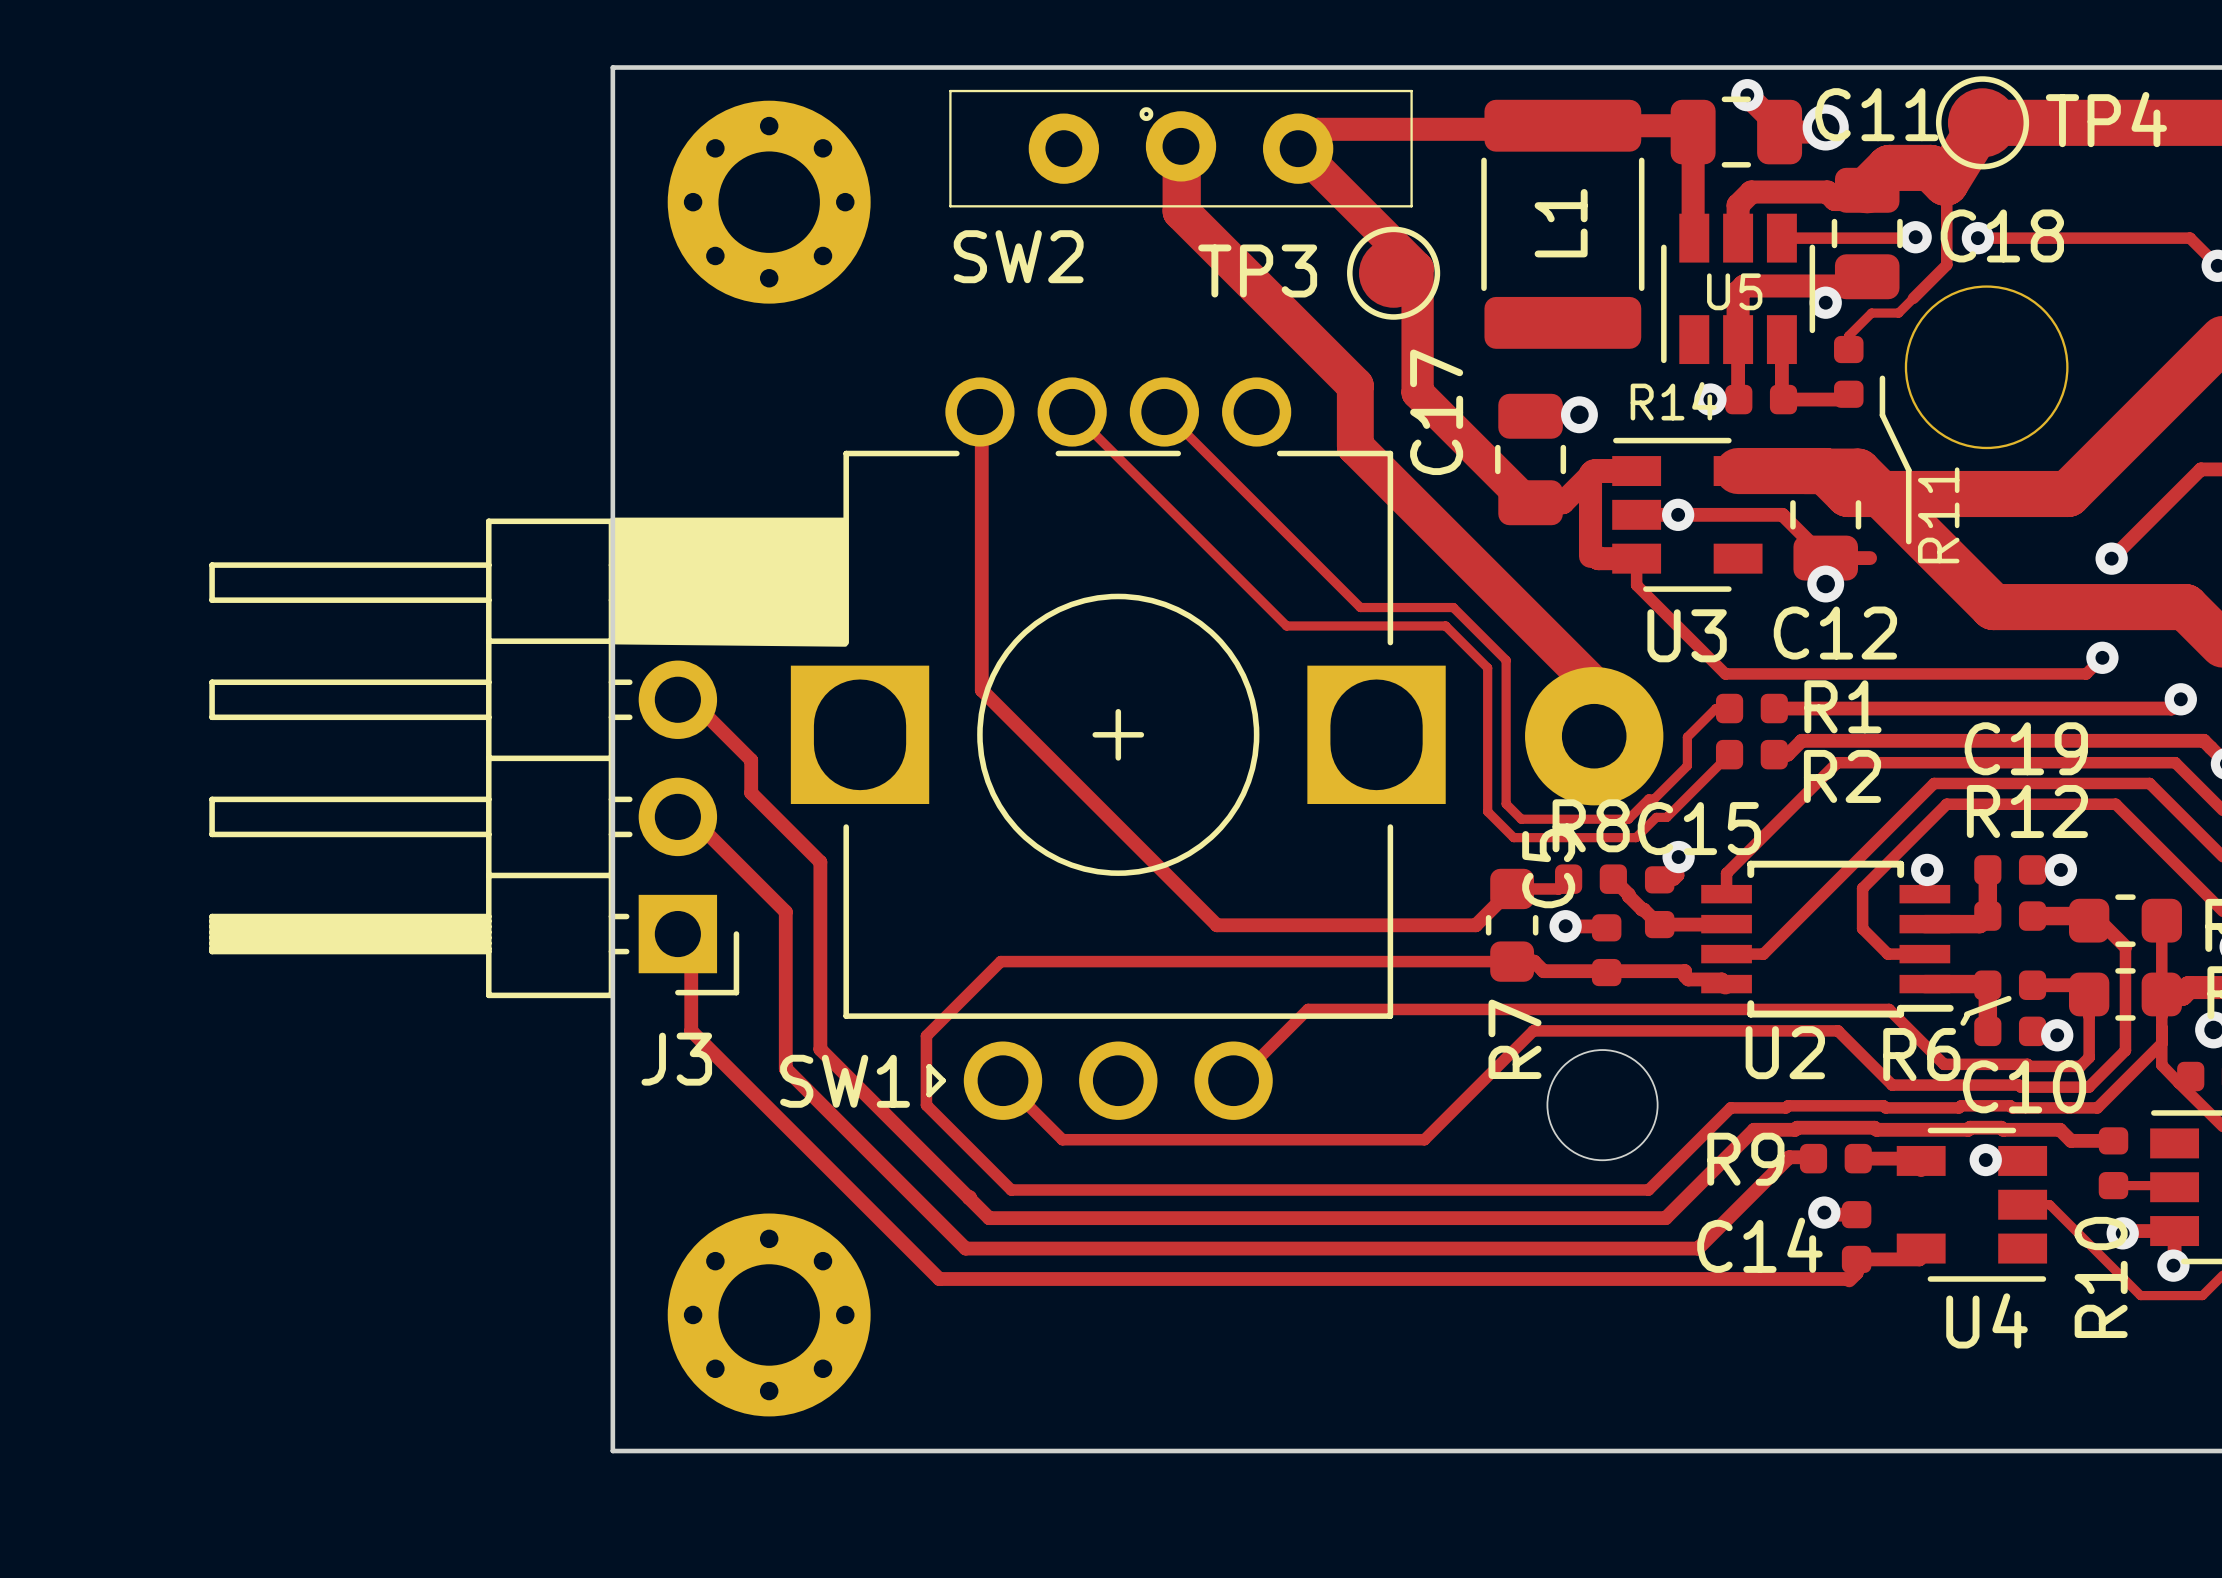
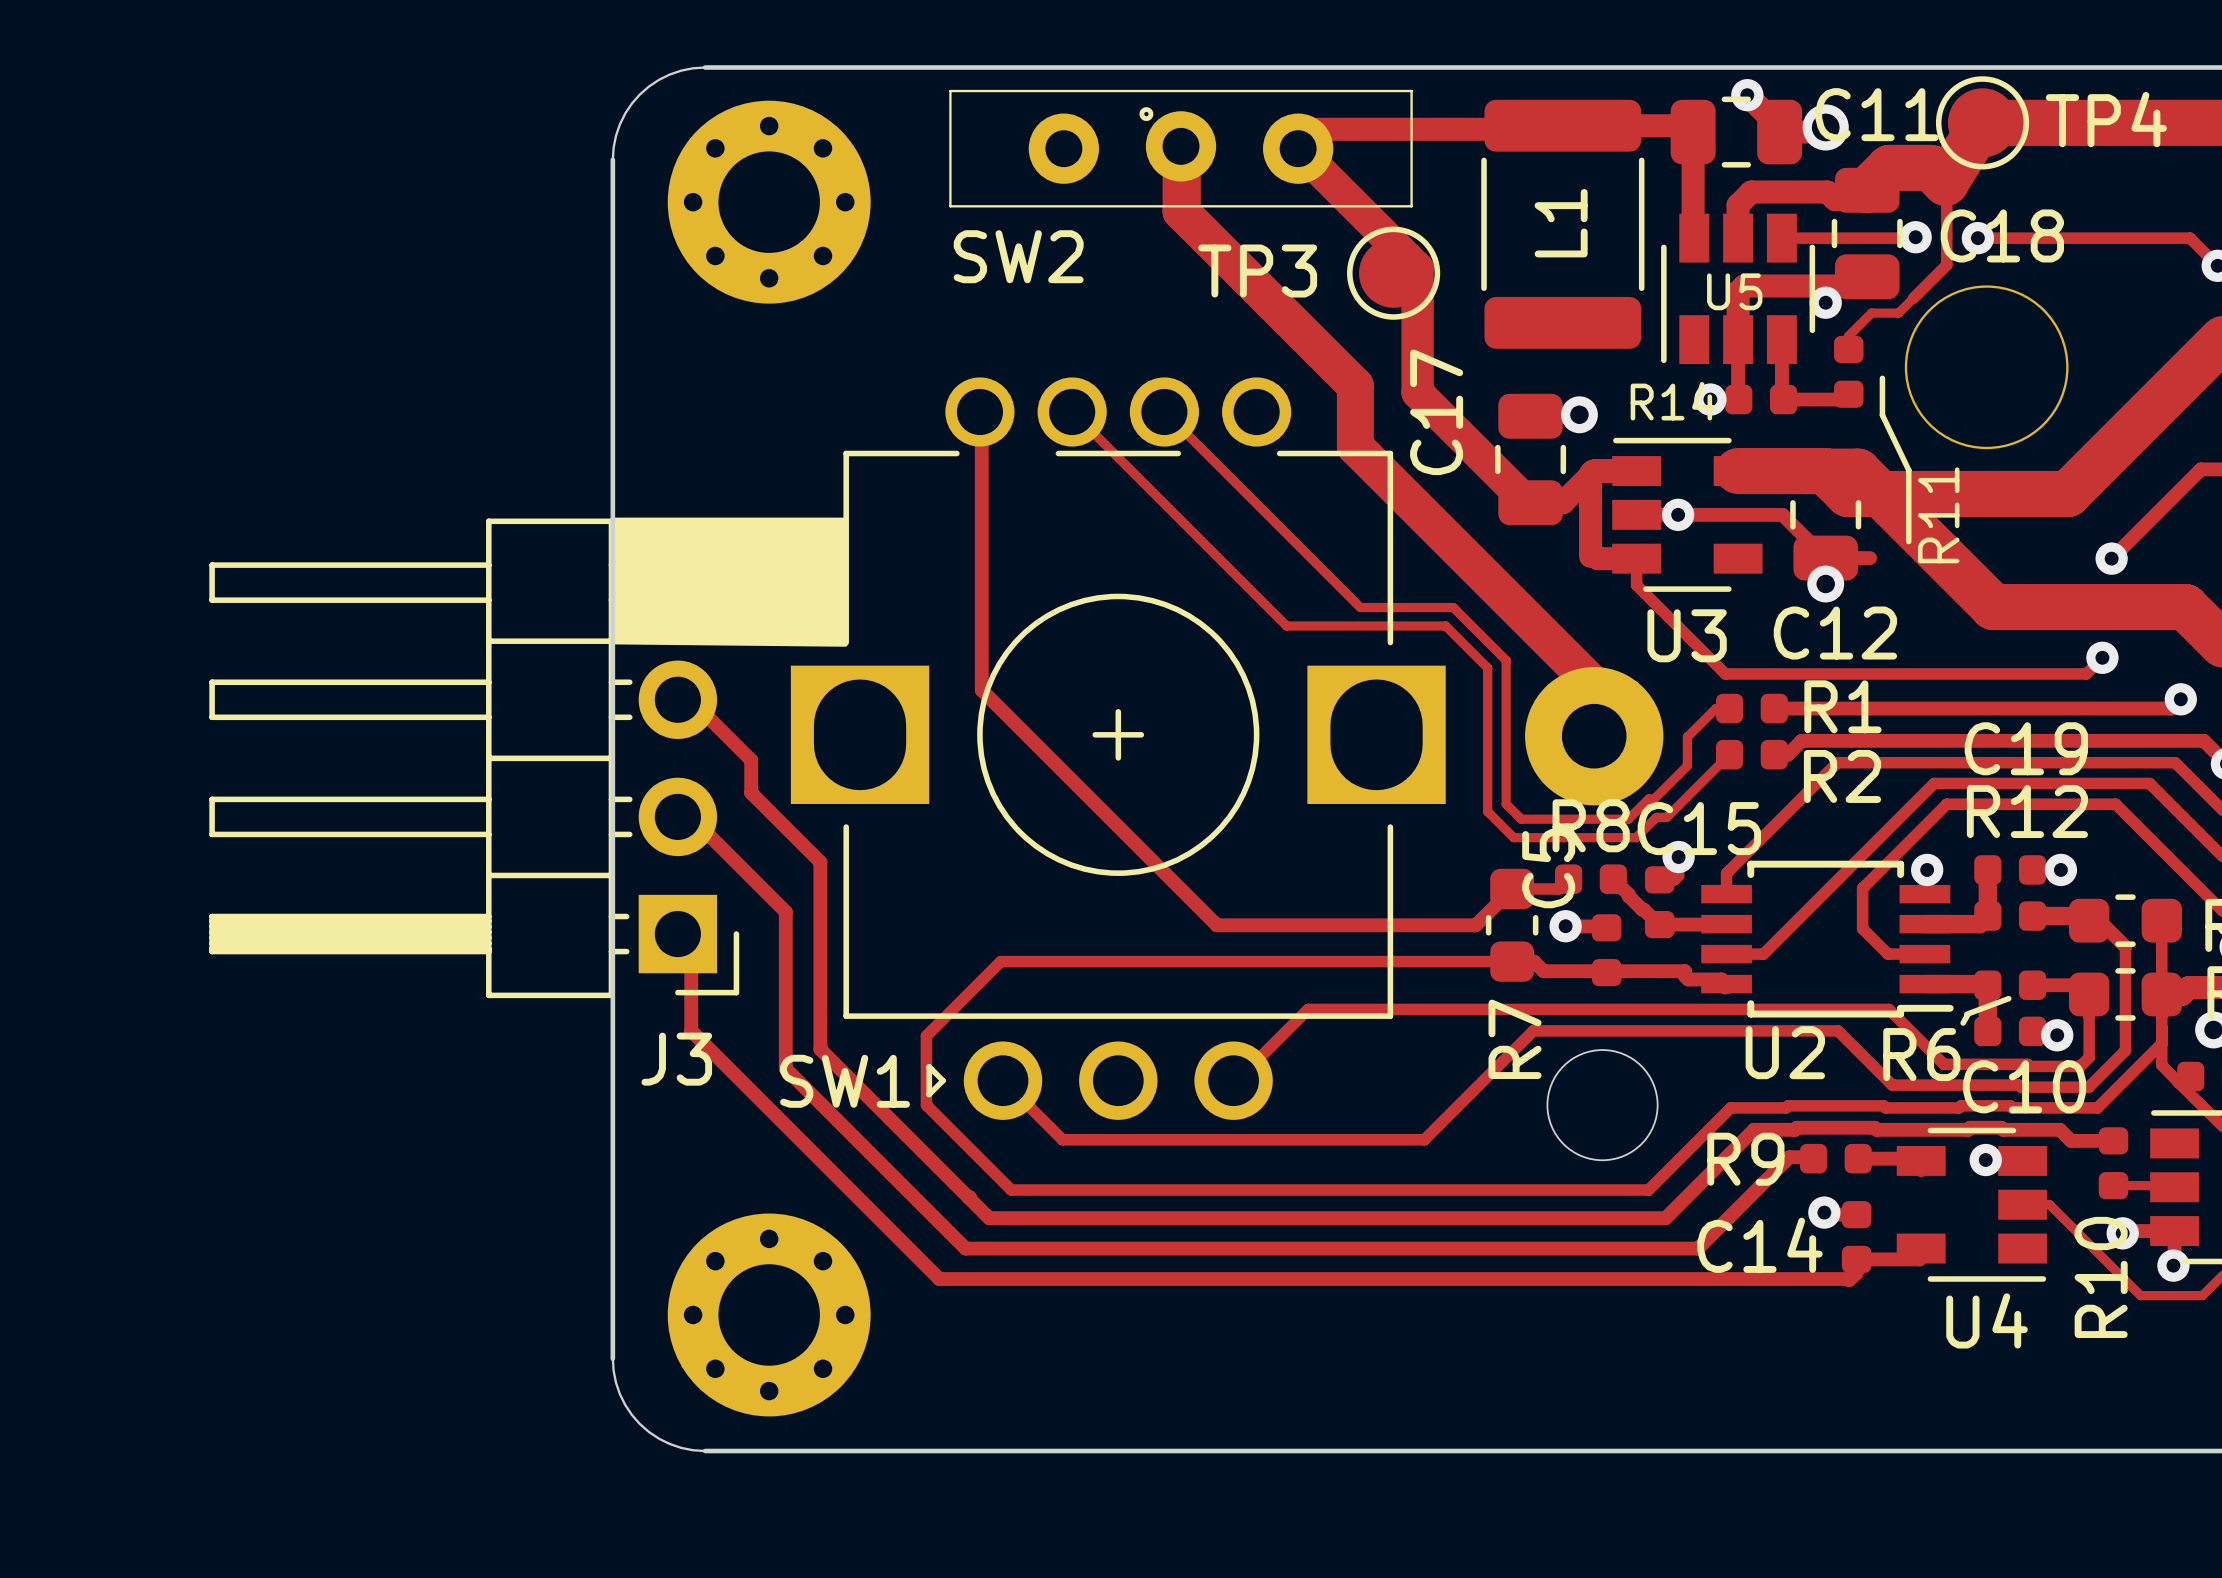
board edge: (705, 67) (612, 67) (612, 159) -> (705, 67) (681, 70) (669, 74) (648, 86) (639, 94) (625, 113) (619, 124) (613, 147) (612, 159)
board edge: (612, 1358) (612, 1451) (705, 1451) -> (612, 1358) (613, 1370) (619, 1394) (631, 1414) (639, 1424) (658, 1438) (669, 1443) (681, 1447) (705, 1451)

